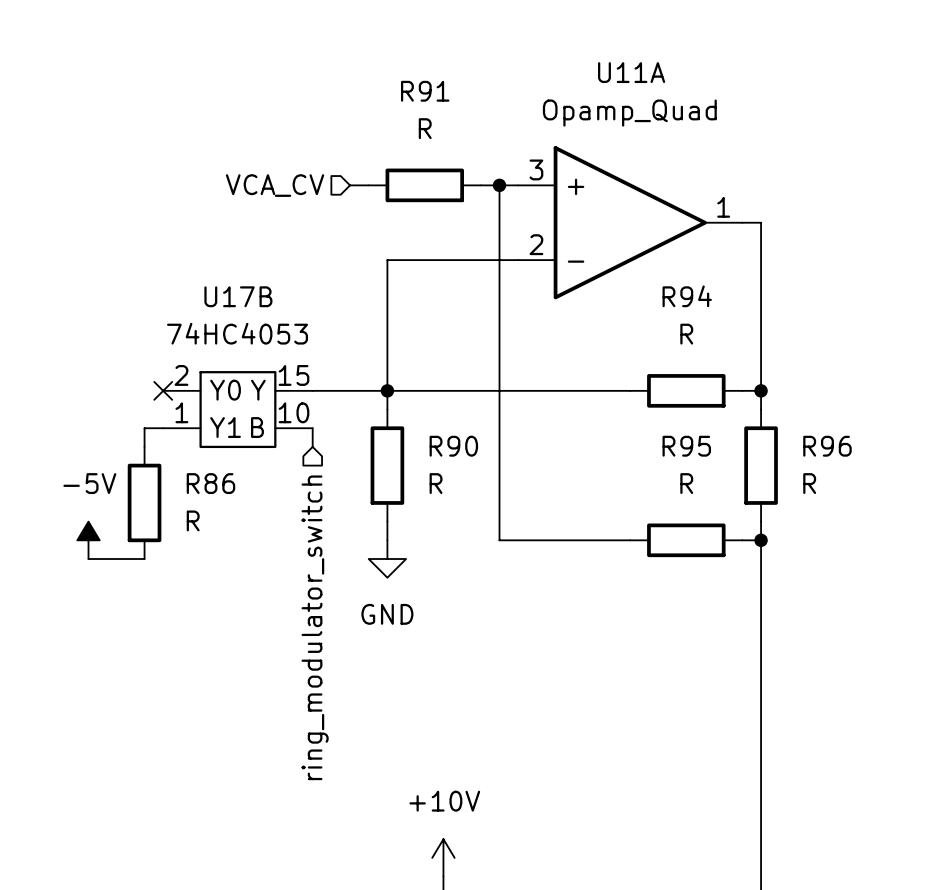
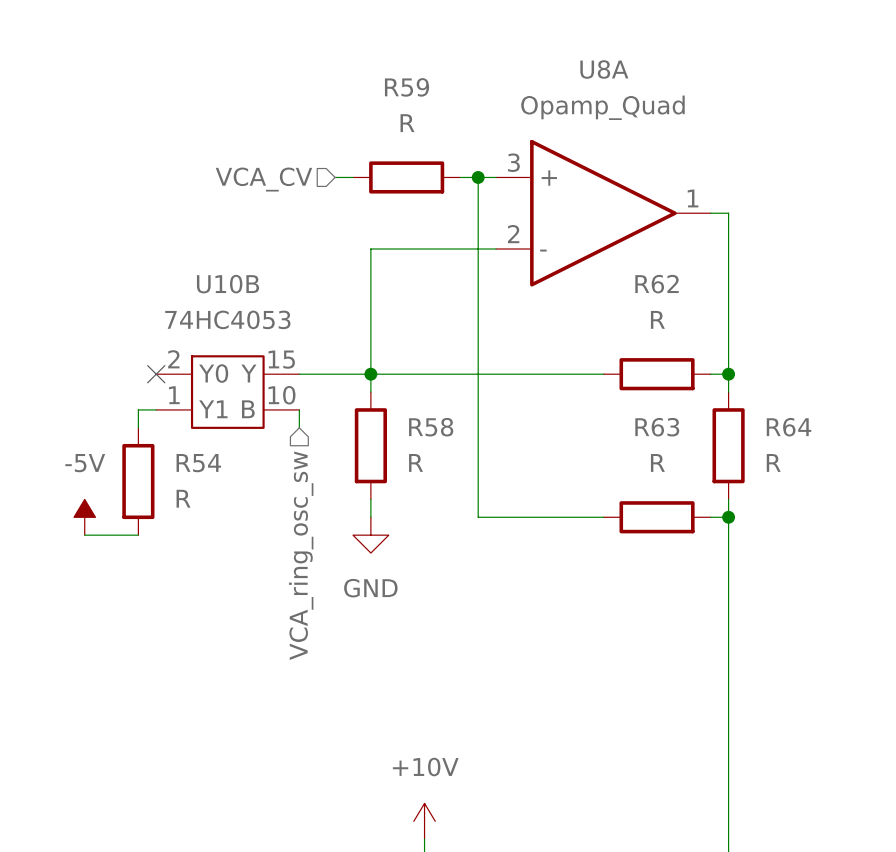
U11A name: U11A (631, 72) -> U8A (604, 69)
R91 name: R91 (425, 91) -> R59 (407, 87)
U17B name: U17B (238, 296) -> U10B (228, 284)
R94 name: R94 (687, 296) -> R62 (657, 284)
R90 name: R90 (453, 446) -> R58 (431, 427)
R95 name: R95 (686, 446) -> R63 (657, 427)
R96 name: R96 (827, 446) -> R64 (789, 427)
R86 name: R86 (210, 483) -> R54 (198, 463)
hierarchical label: ring_modulator_switch (315, 627) -> VCA_ring_osc_sw (301, 555)

